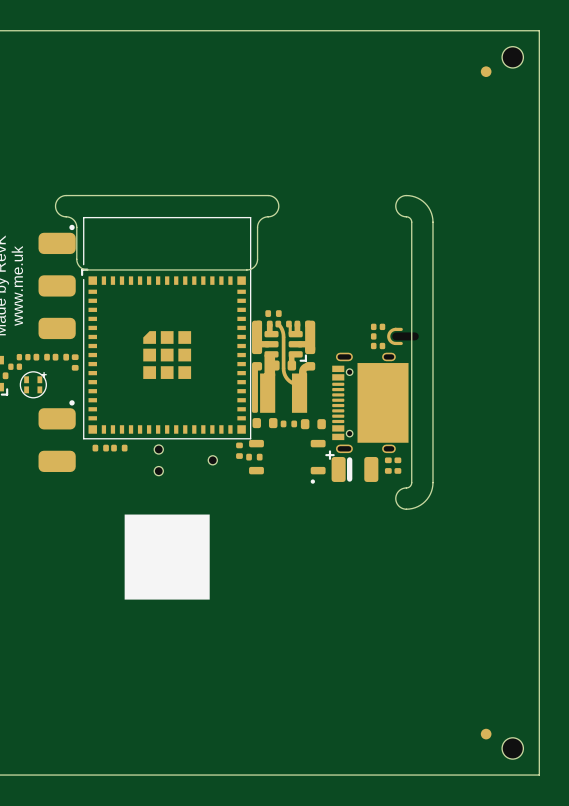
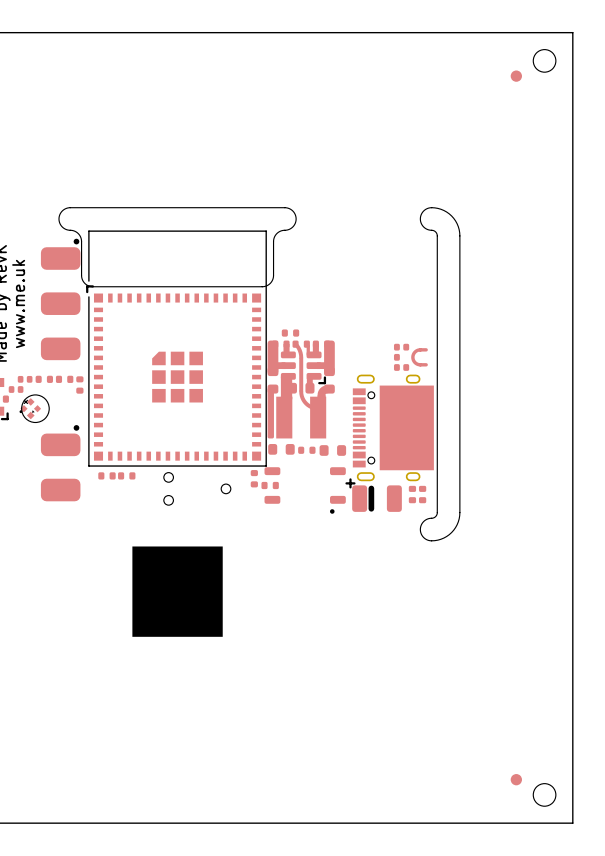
part footprint: [24, 371, 47, 394] -> [19, 398, 41, 420]

